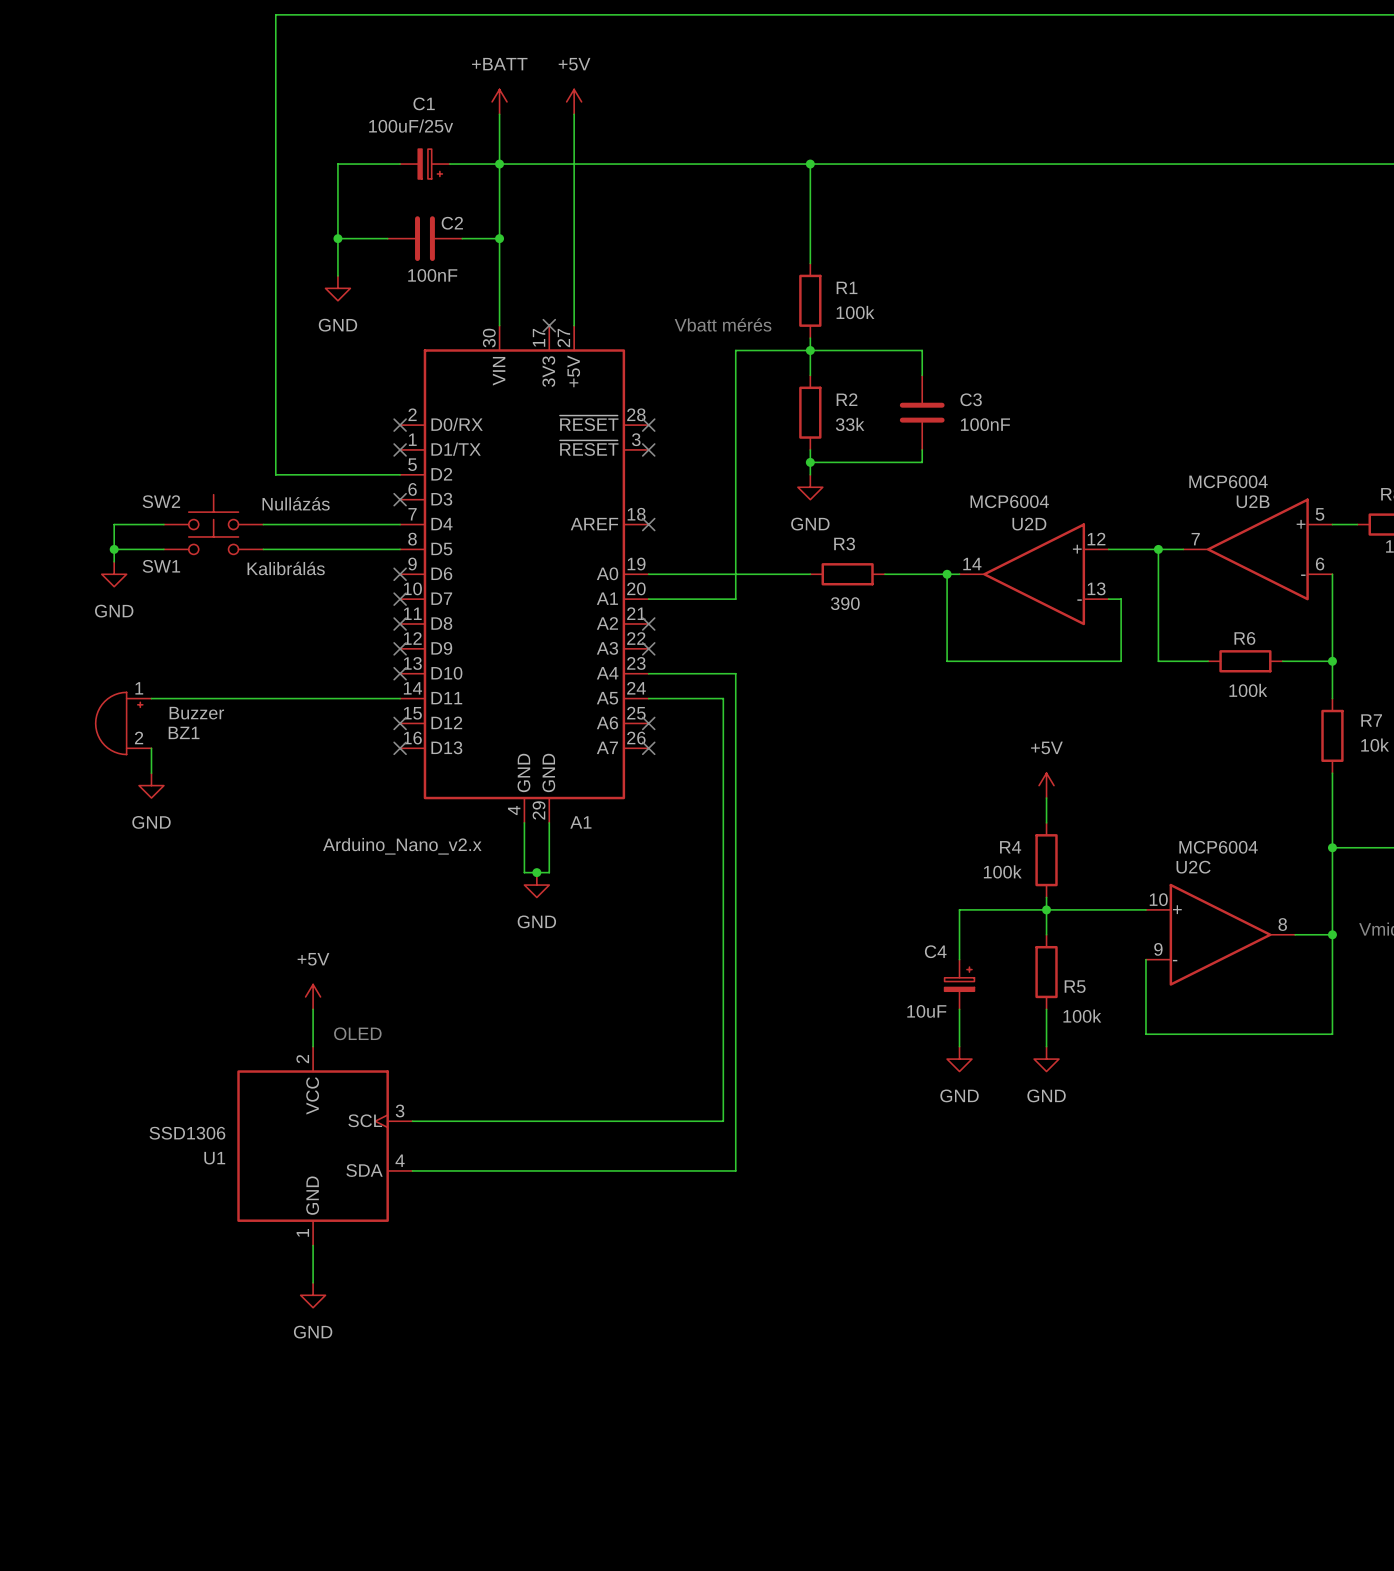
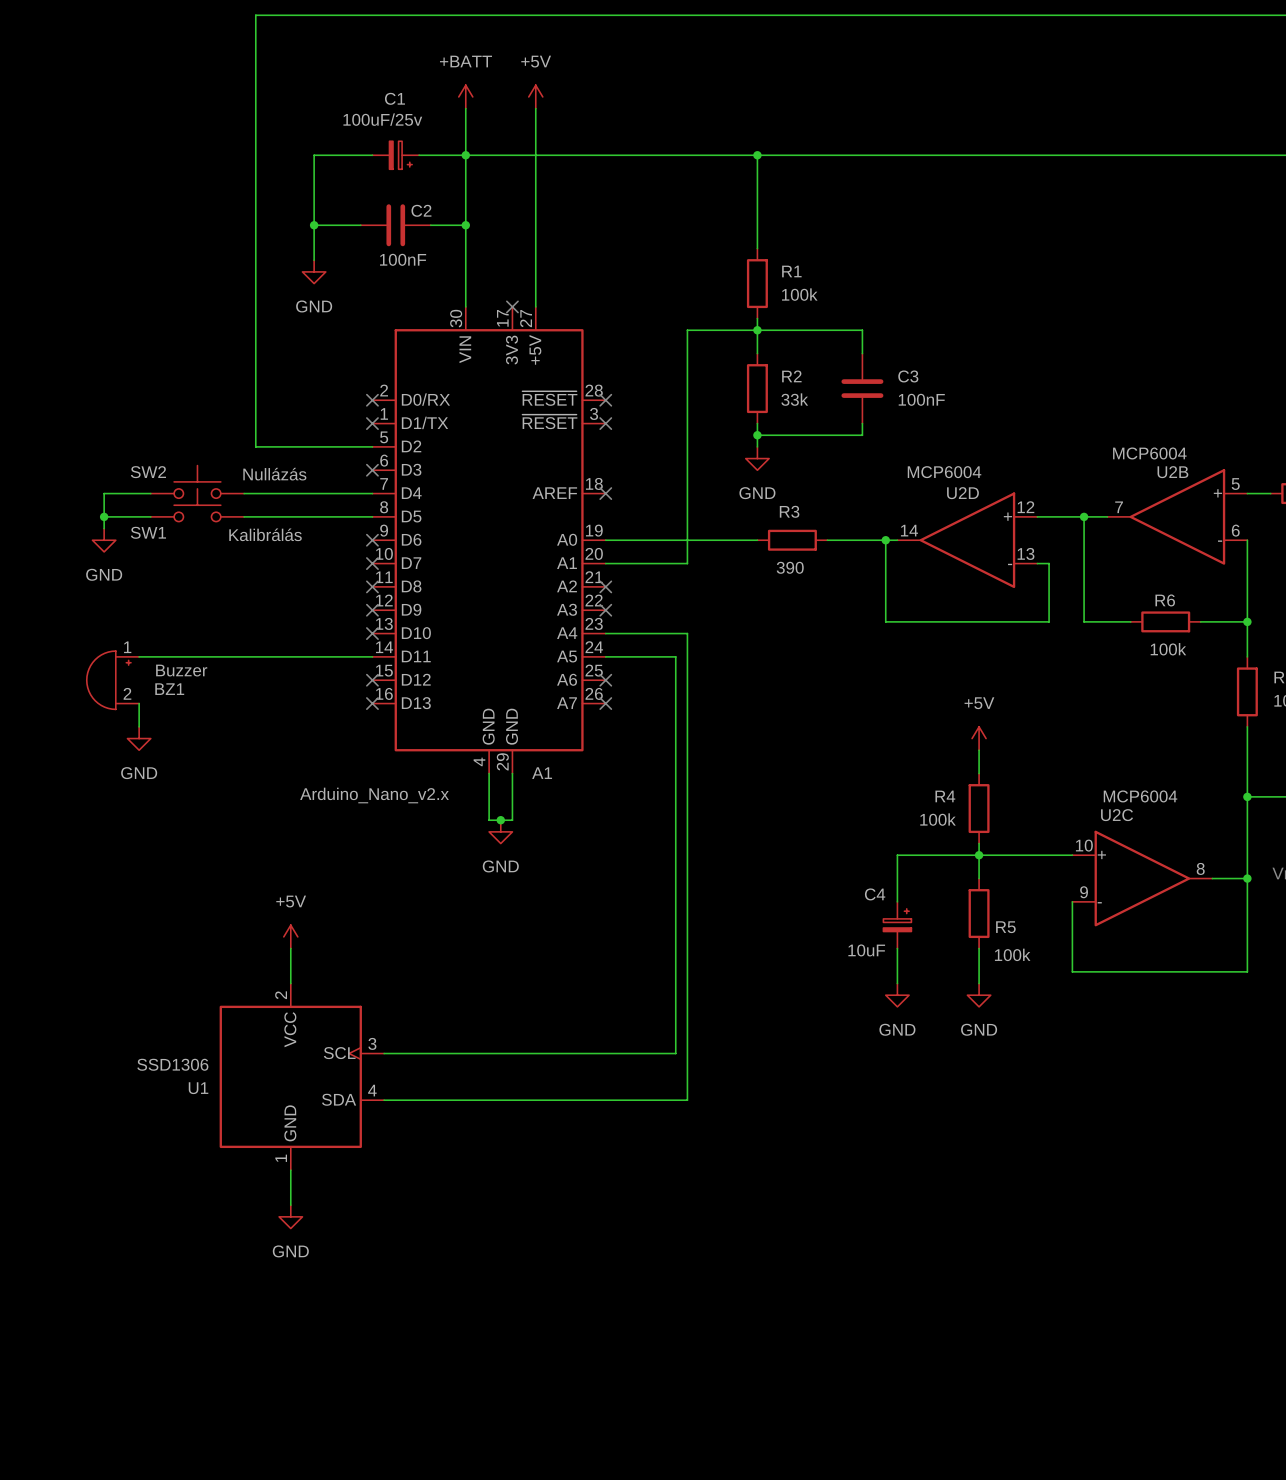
text: Vbatt mérés (723, 324) -> none
text: OLED (357, 1033) -> none

